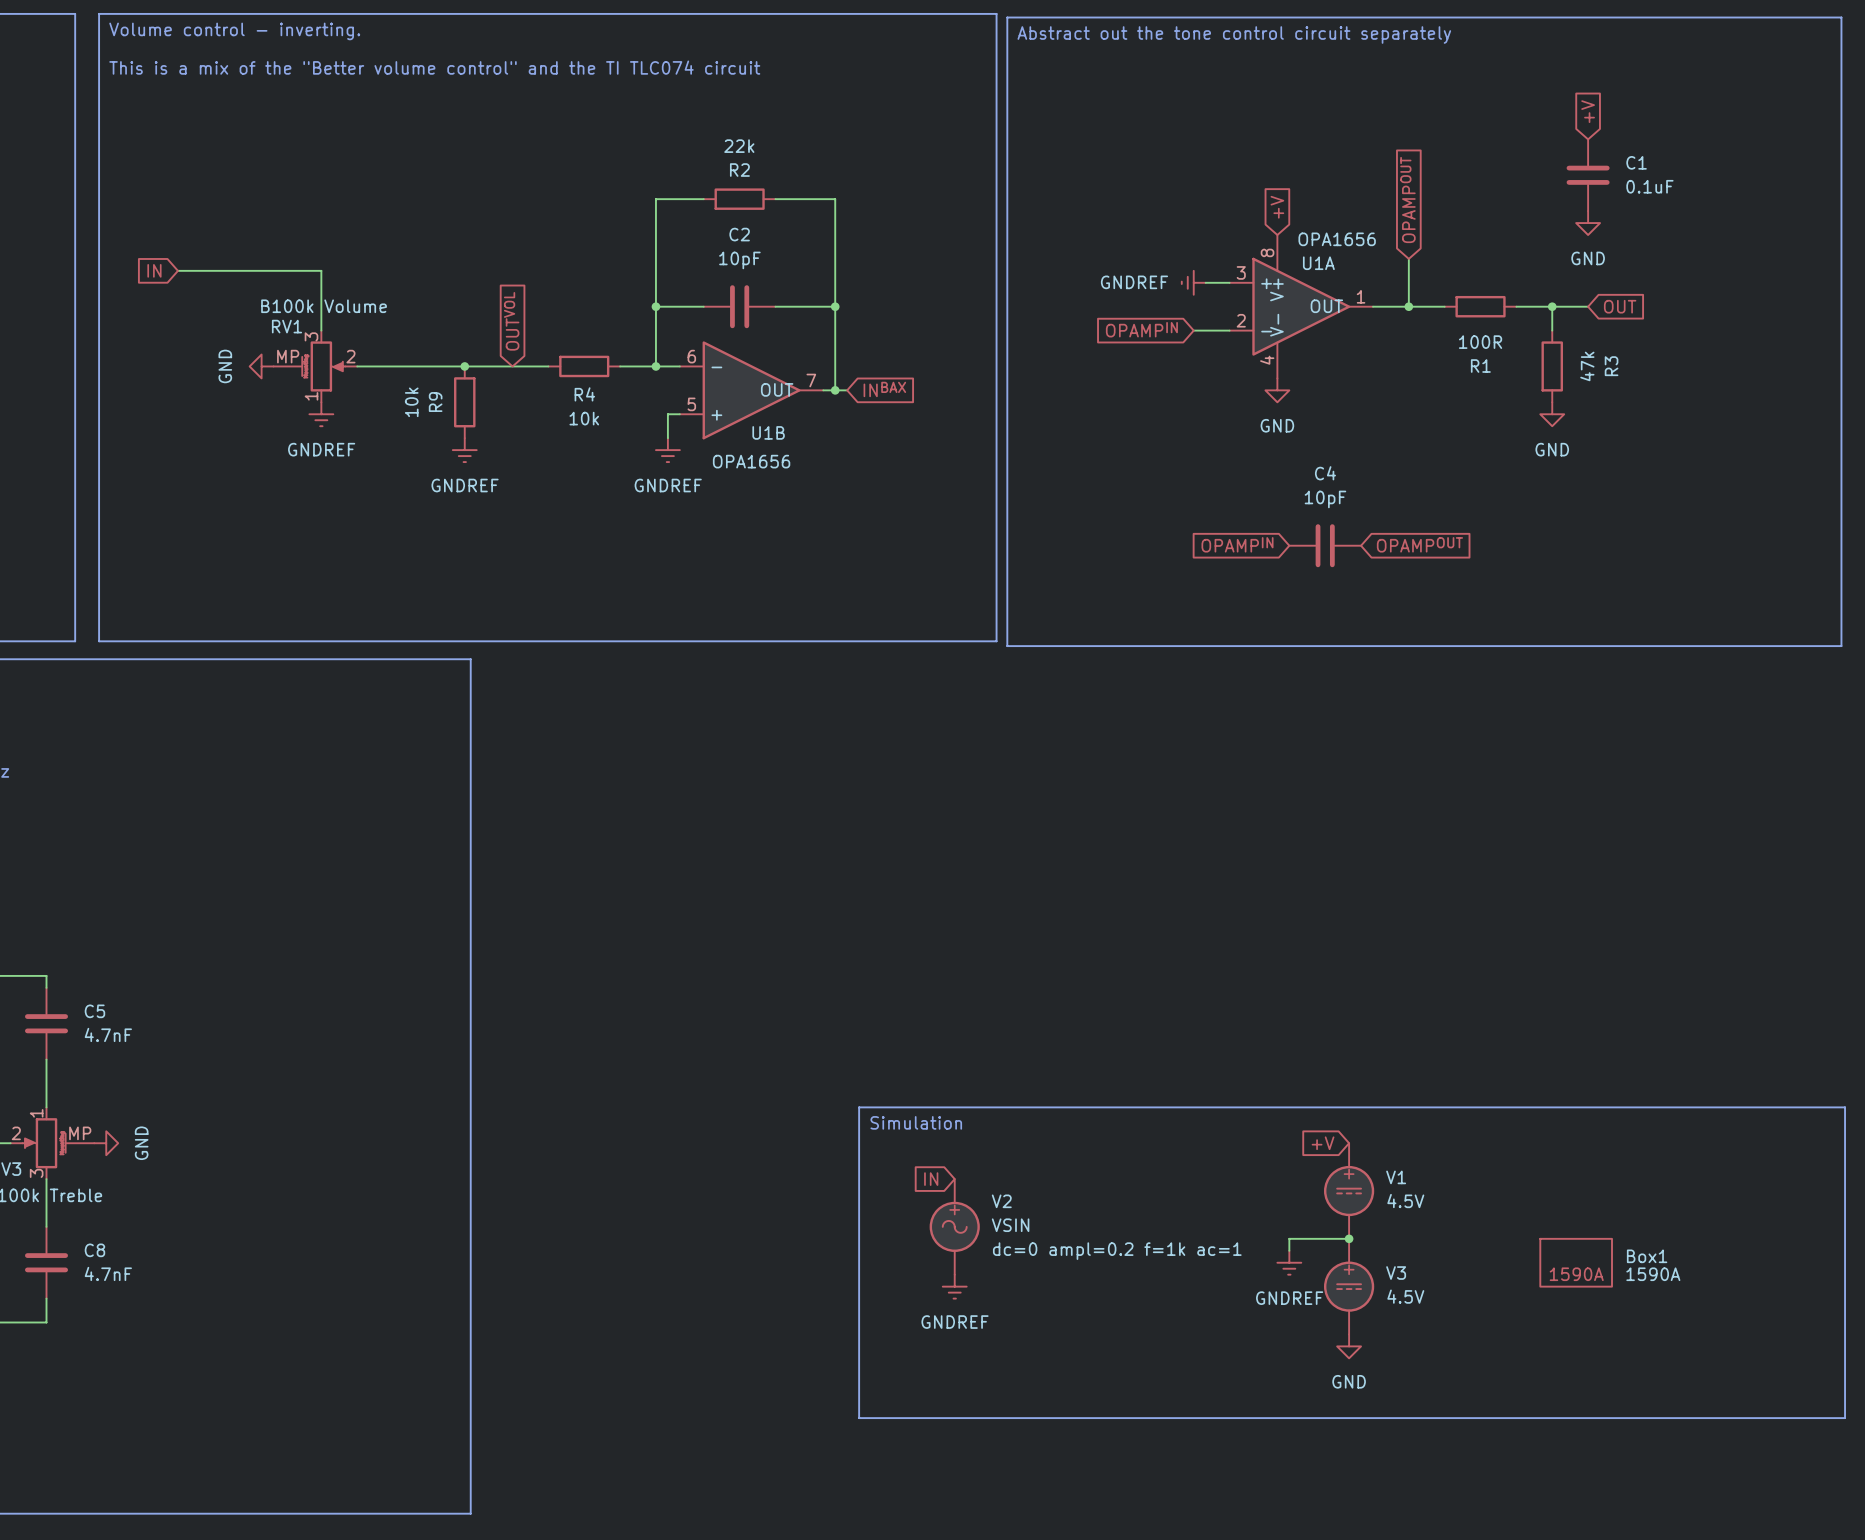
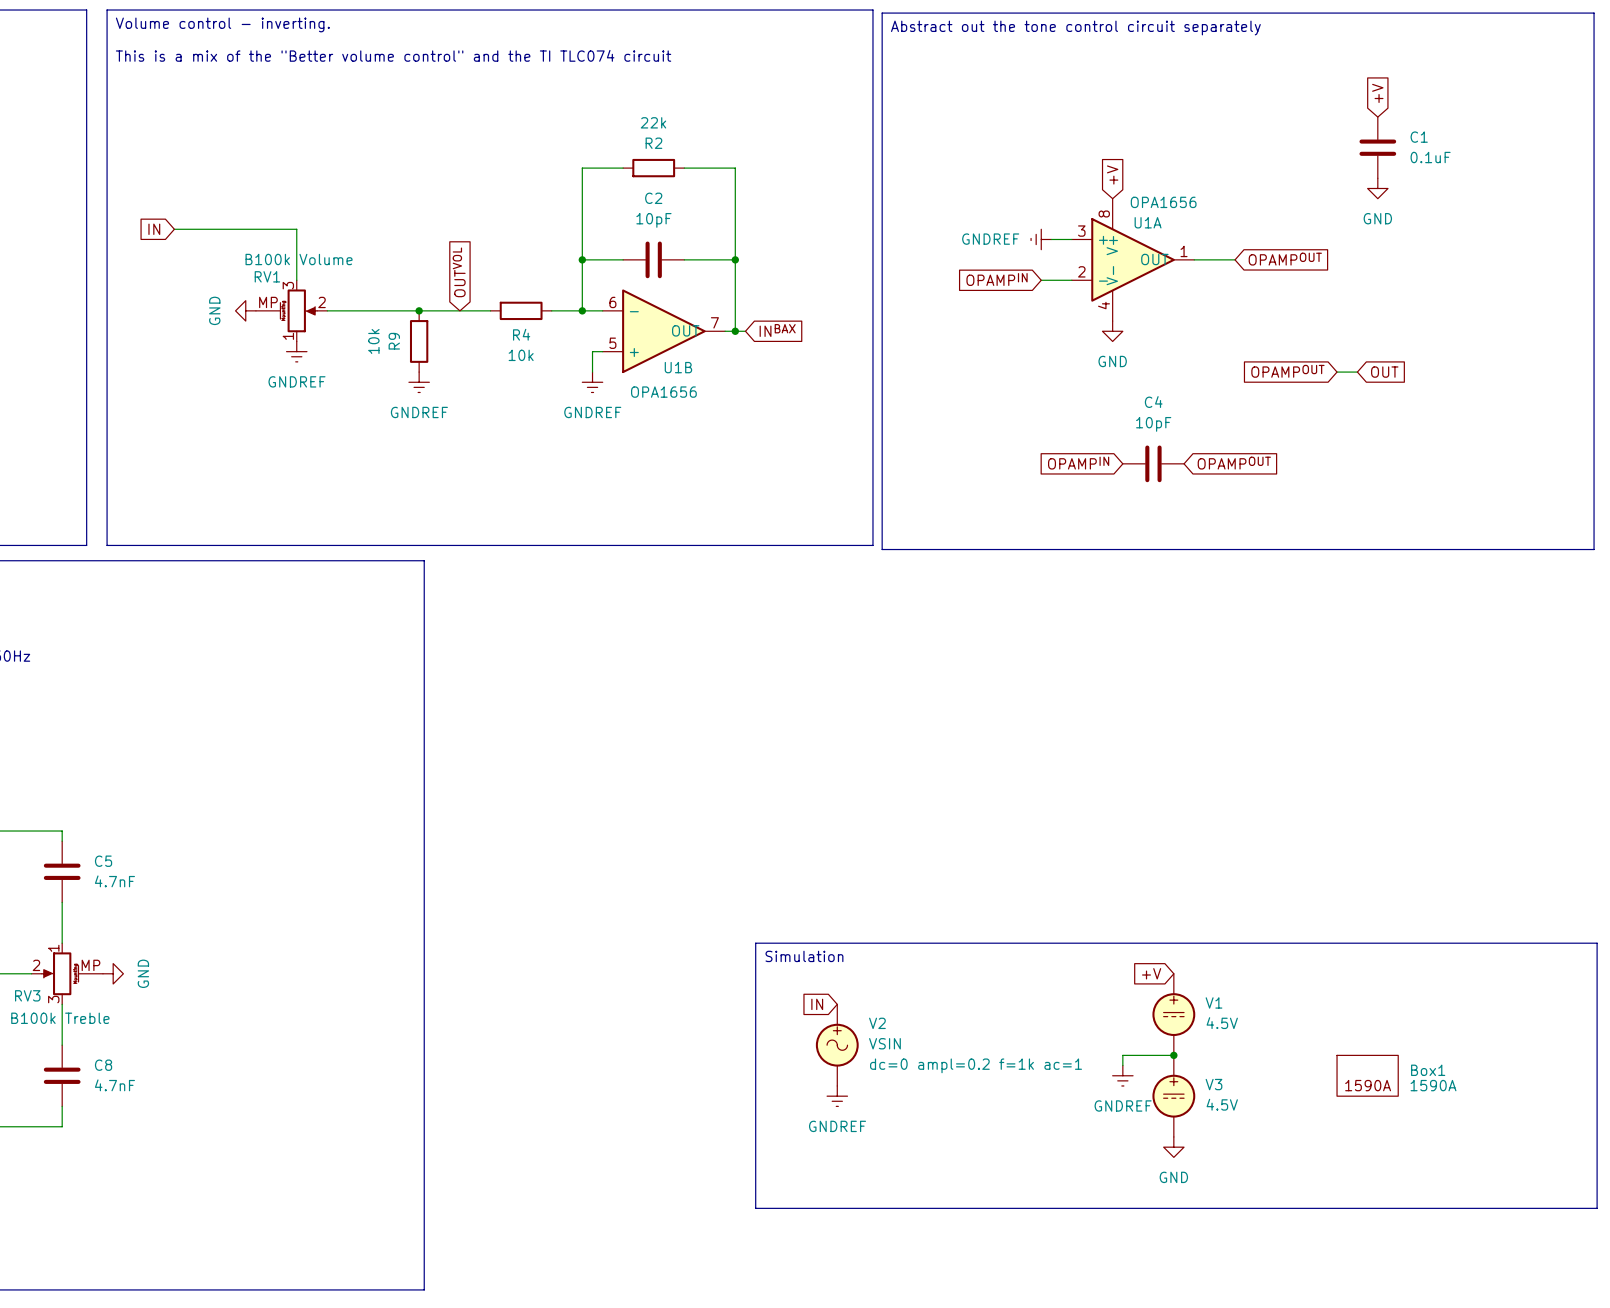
global label rotation: 0° (1407, 200) -> 90° clockwise (1285, 259)
wire: (1408, 258) (1408, 306) -> none
junction: (1408, 306) -> none
wire: (1420, 306) (1444, 306) -> (1337, 372) (1357, 372)
R1: 100R (1480, 306) -> none
wire: (1516, 306) (1588, 306) -> none
wire: (1552, 306) (1552, 330) -> none
junction: (1552, 306) -> none
global label position: OUT (1620, 306) -> OUT (1384, 372)
R3: 47k (1552, 366) -> none
power symbol: GND (1552, 414) -> none
global label: none -> OPAMPOUT (1287, 371)

